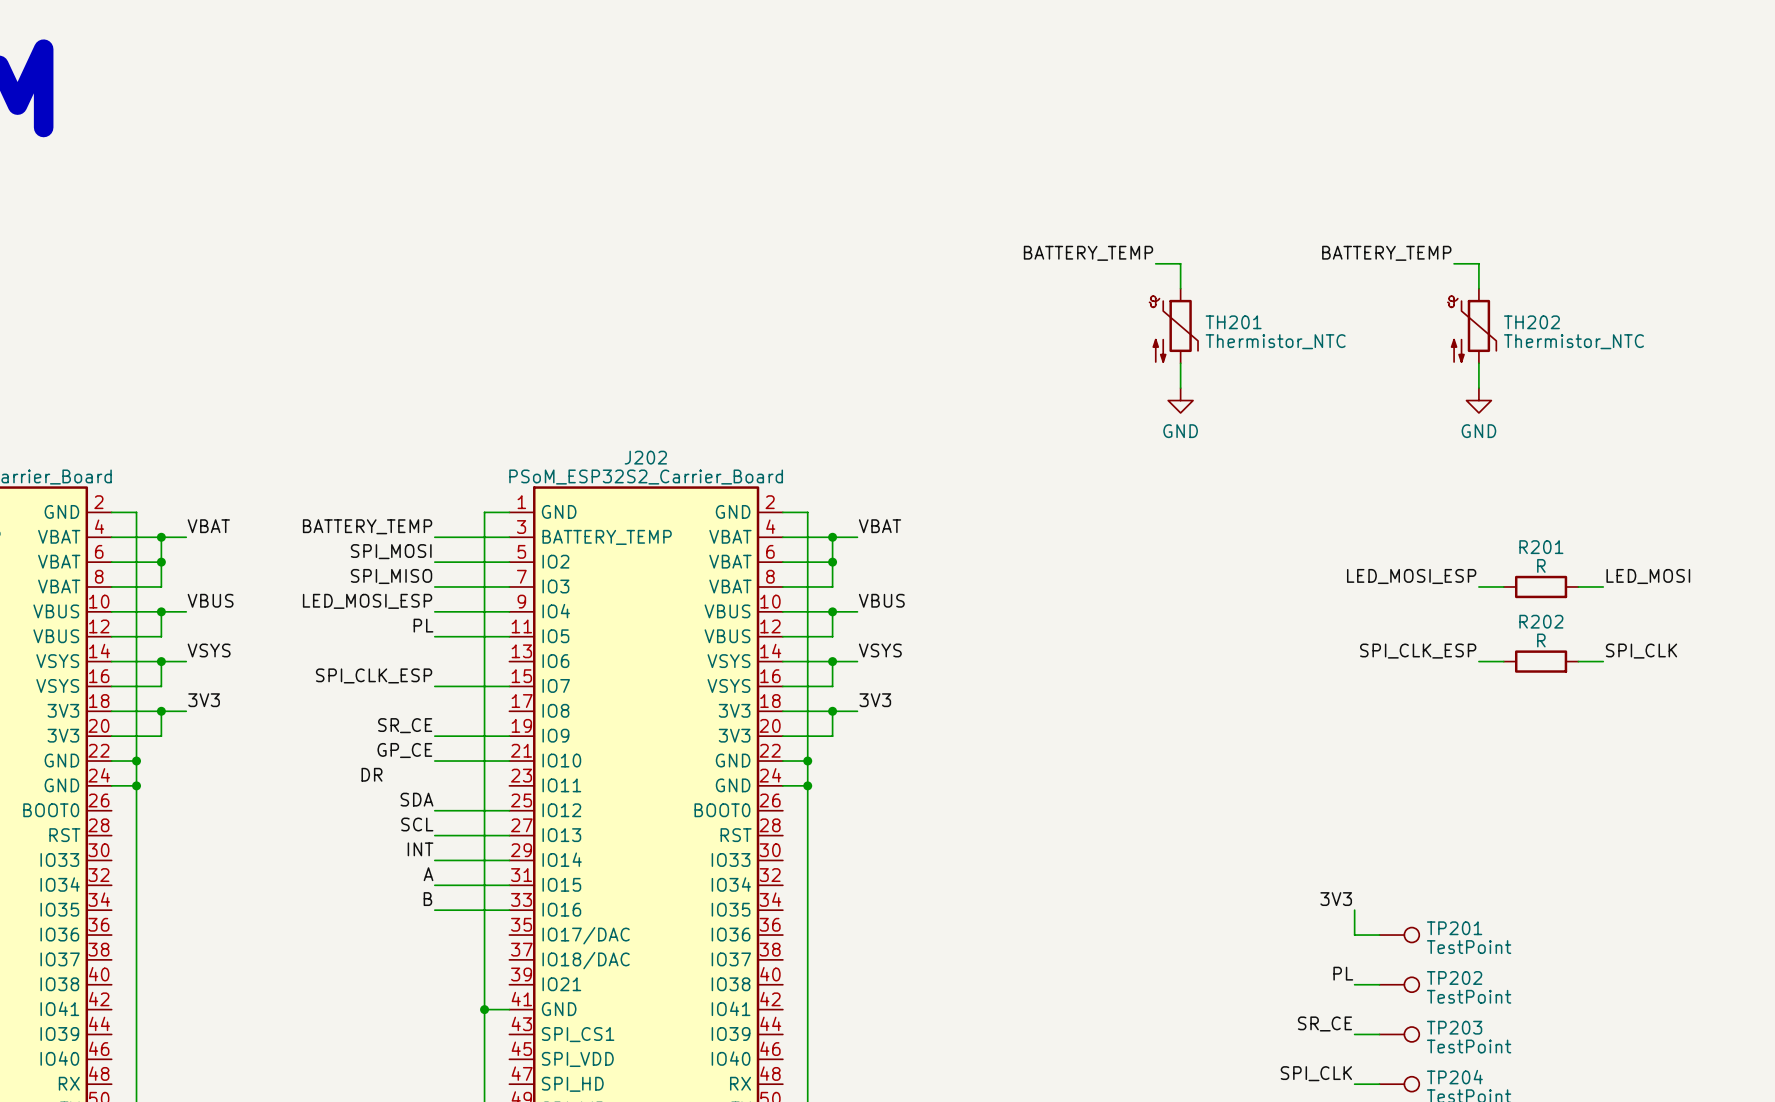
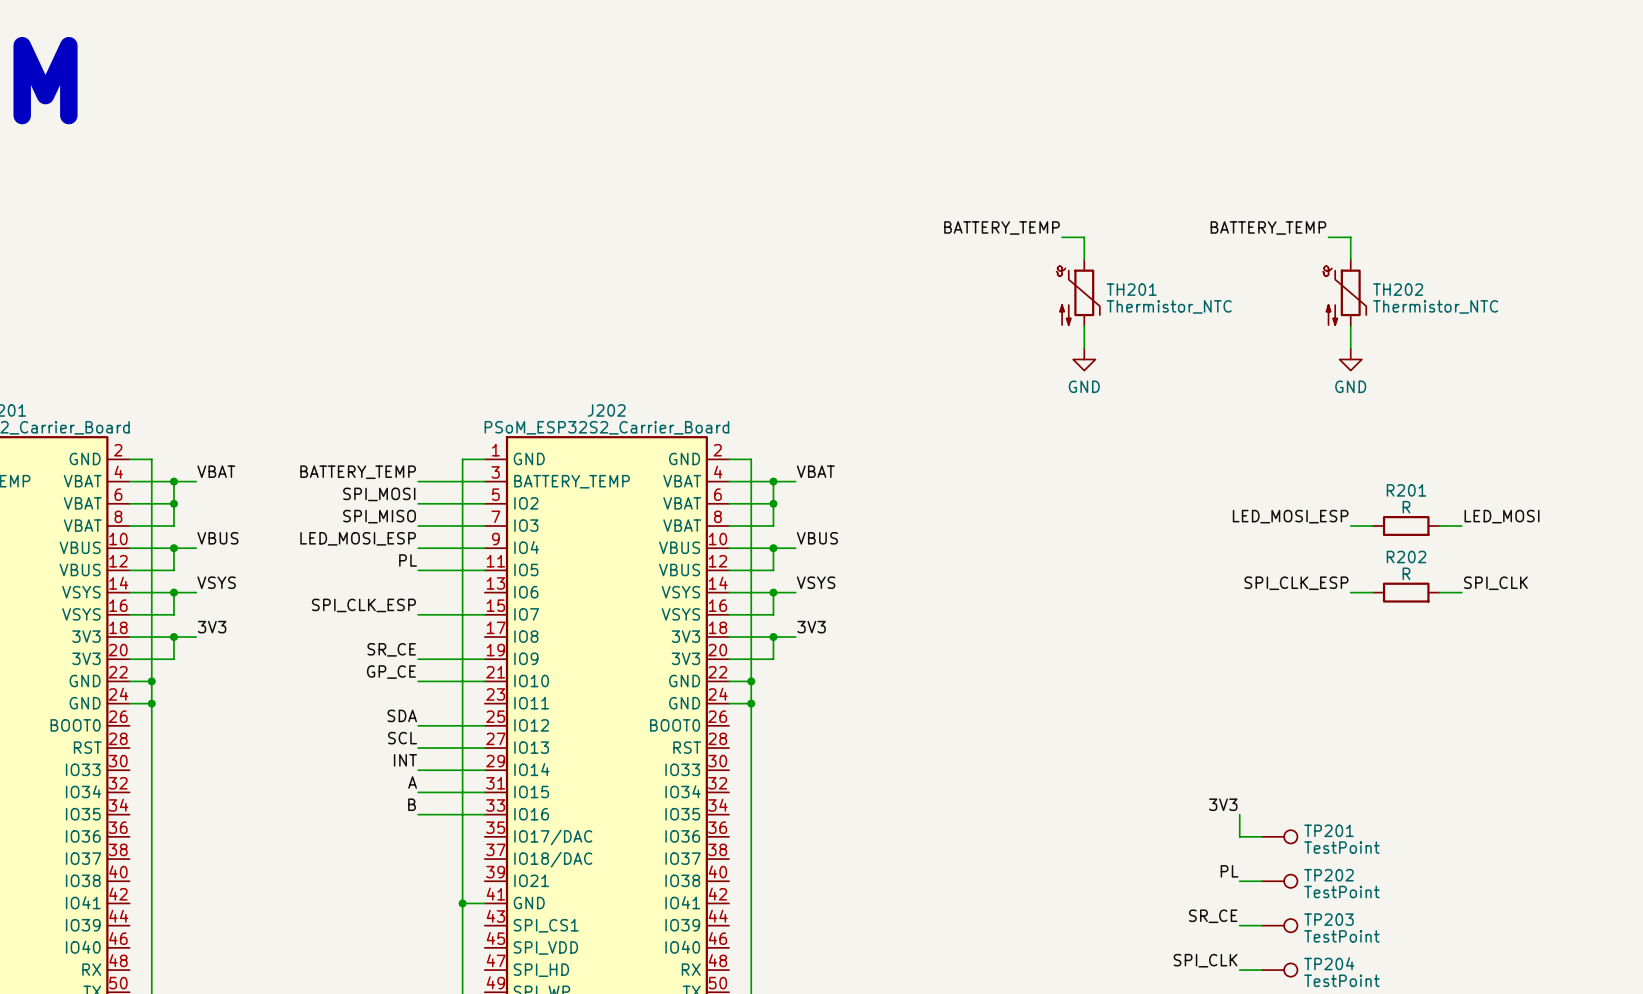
label: DR (371, 774) -> none

